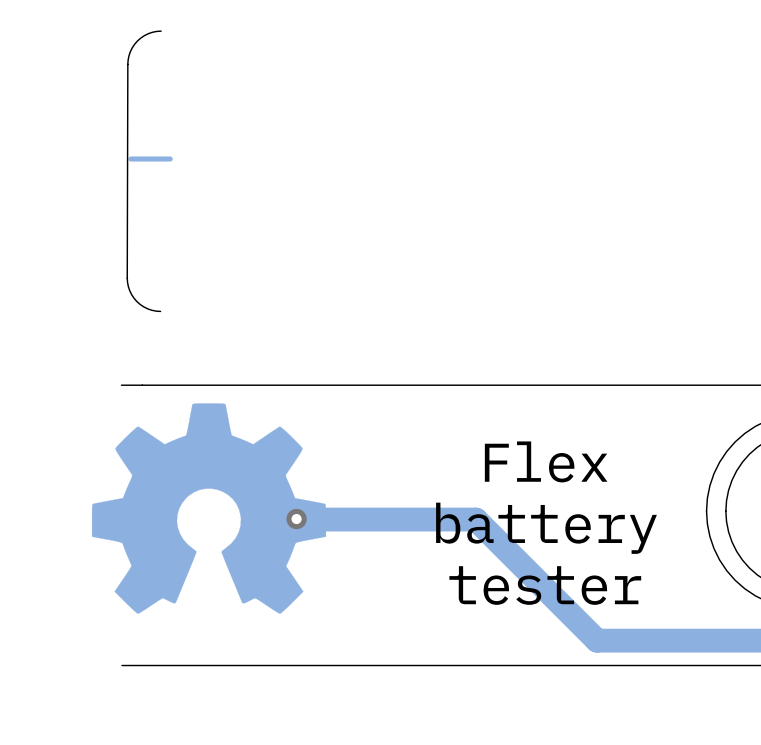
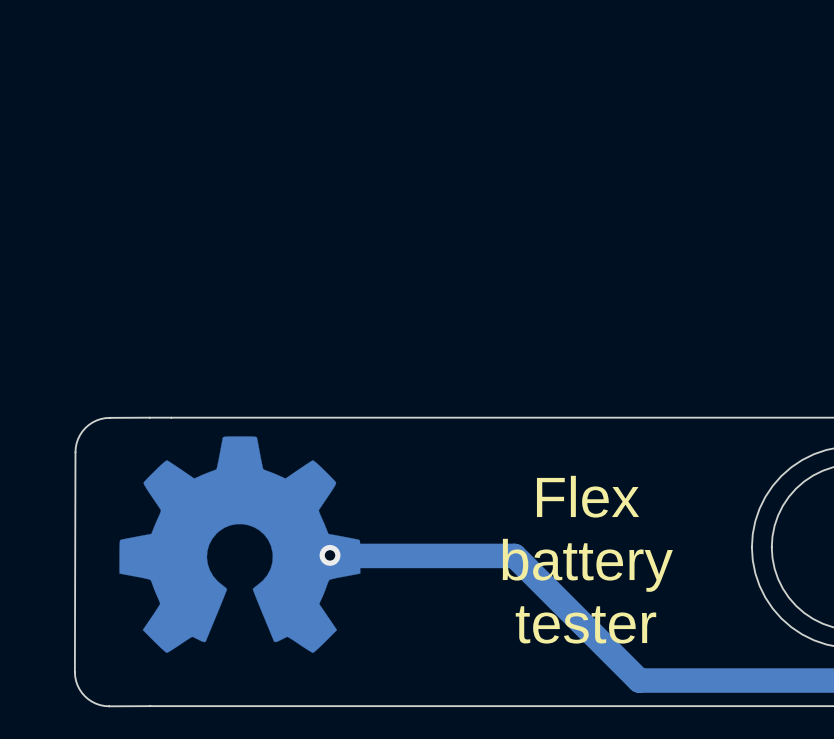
board edge: (161, 31) (152, 32) (140, 38) (132, 47) (128, 60) (127, 278) (129, 290) (137, 301) (147, 308) (160, 311) -> none
track: (170, 159) (130, 159) -> none
board edge: none -> (149, 417) (109, 417) (96, 420) (82, 431) (76, 443) (74, 672) (77, 685) (81, 692) (96, 703) (109, 706) (150, 706)

